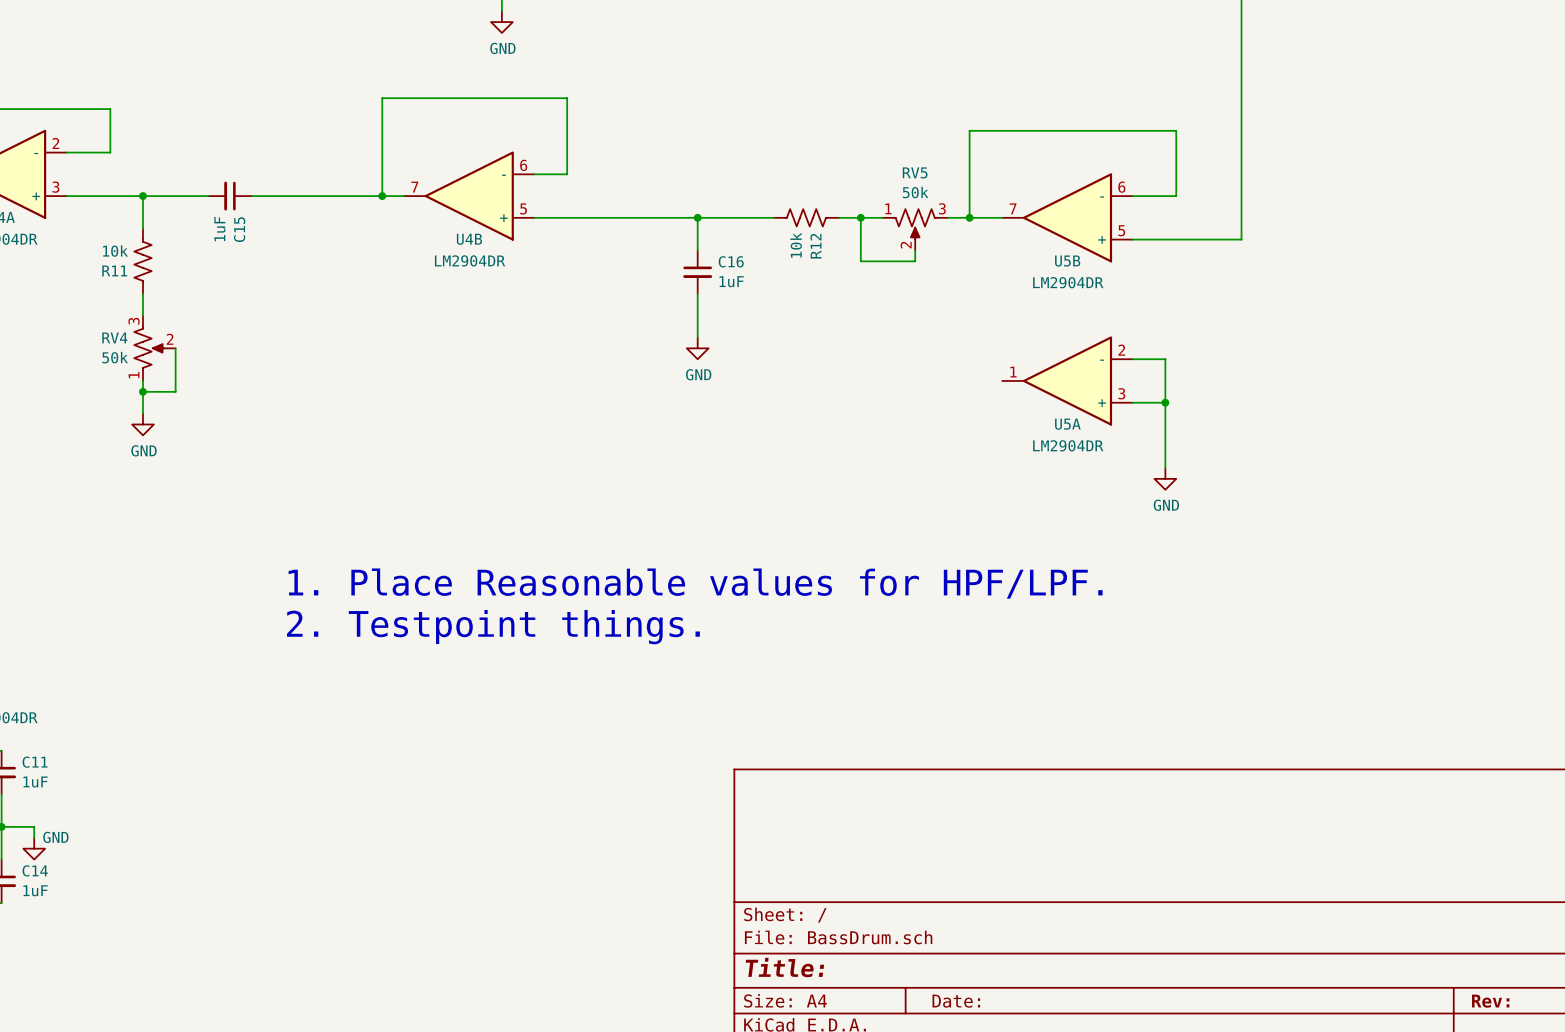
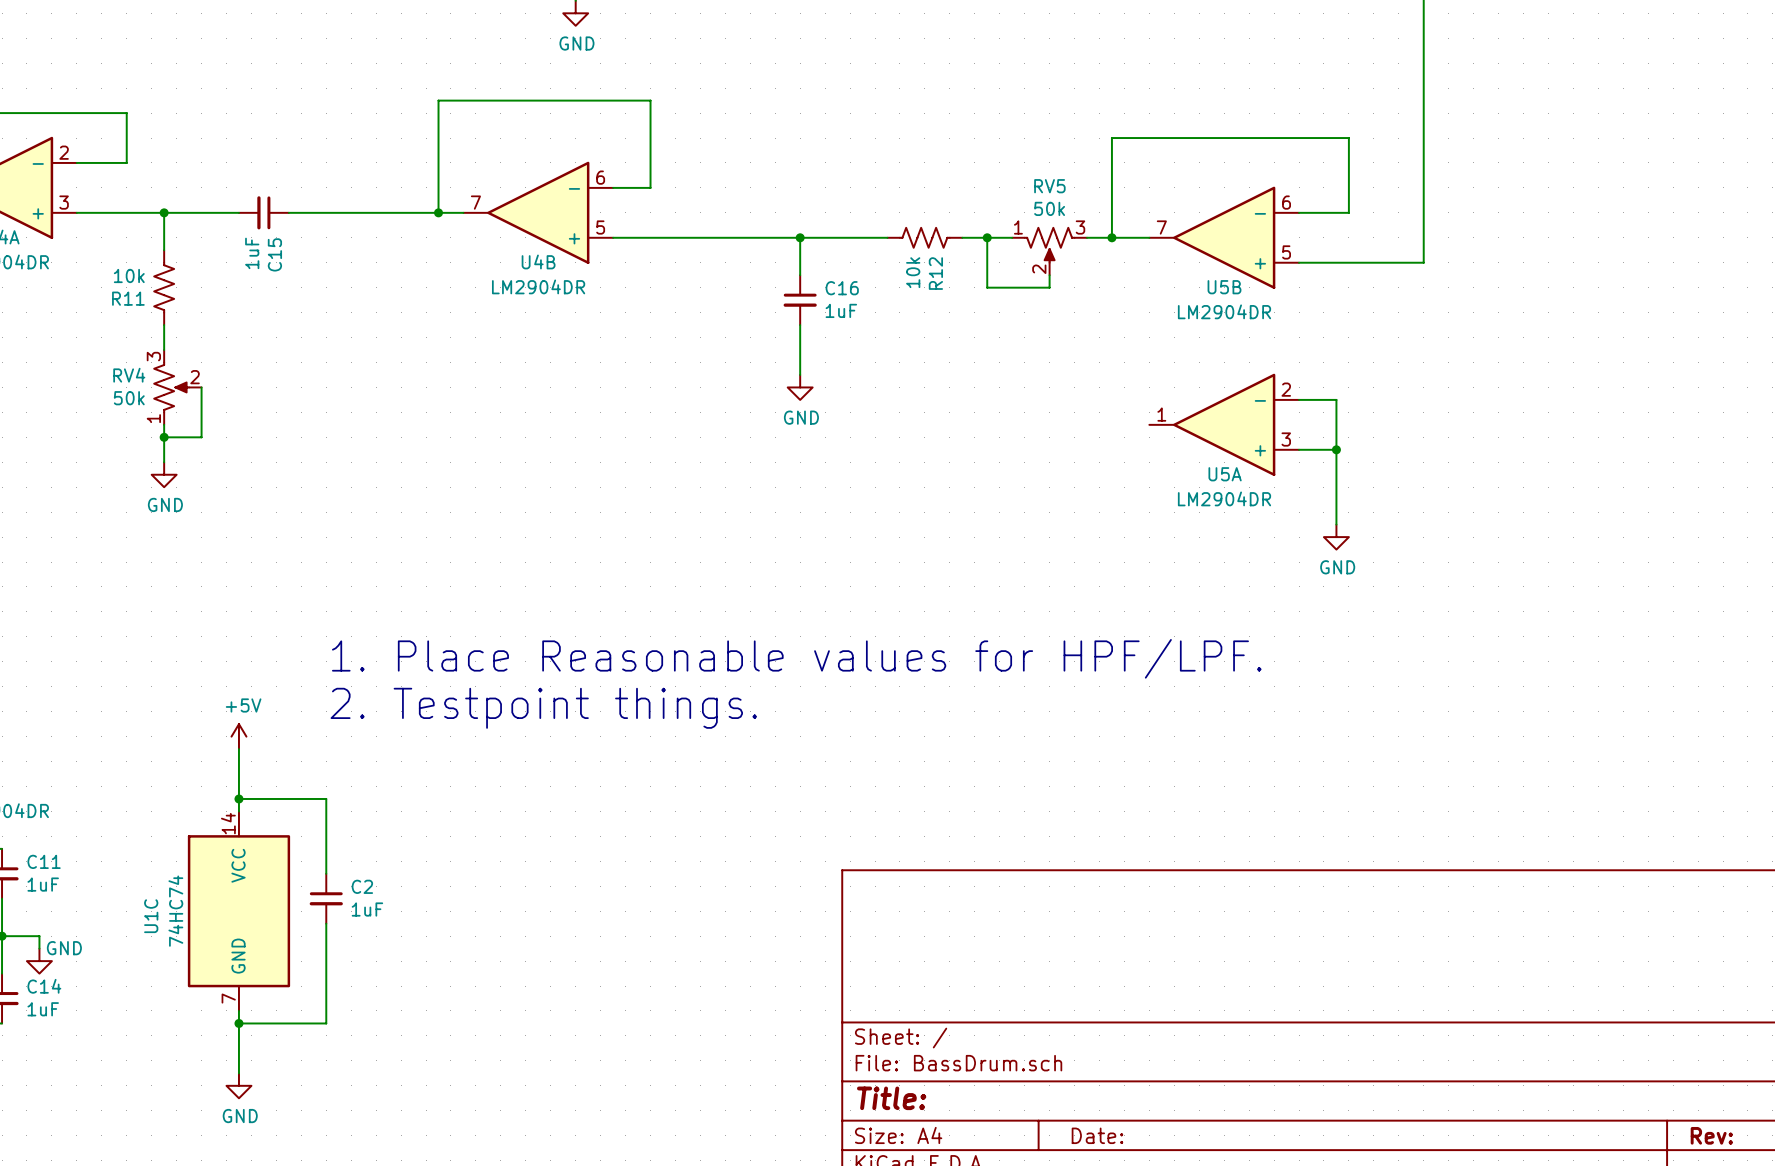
power symbol: none -> +5V (238, 736)
wire: none -> (238, 749) (238, 811)
wire: none -> (238, 798) (326, 798) (326, 873)
junction: none -> (238, 798)
C2: none -> 1uF (326, 898)
U1C: none -> 74HC74 (238, 911)
wire: none -> (326, 923) (326, 1023) (238, 1023)
wire: none -> (238, 1010) (238, 1073)
junction: none -> (238, 1023)
power symbol: none -> GND (238, 1085)

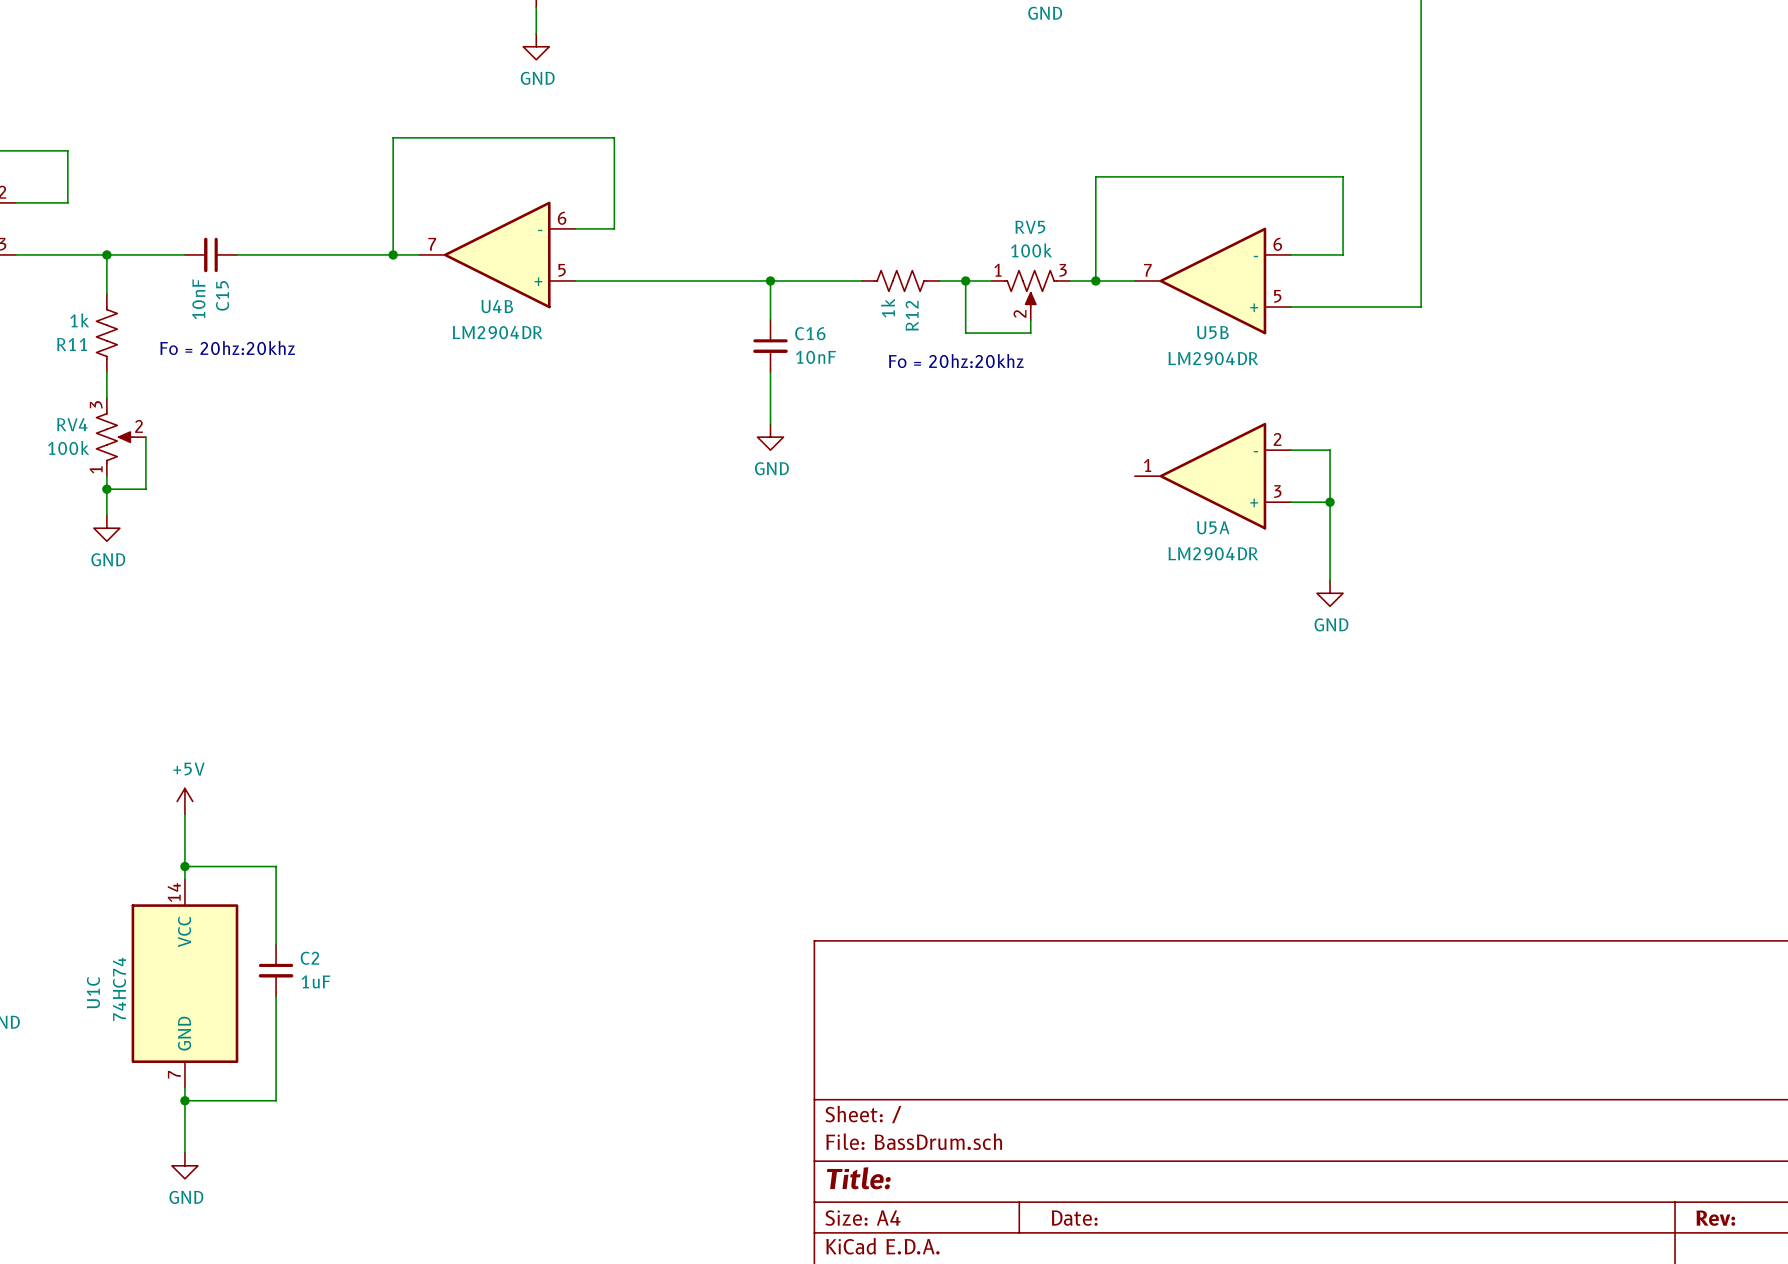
RV5 value: 50k (1049, 208) -> 100k (1031, 250)
C15 value: 1uF (252, 253) -> 10nF (198, 299)
R12 value: 10k (913, 272) -> 1k (888, 308)
R11 value: 10k (129, 275) -> 1k (79, 320)
text: none -> Fo = 20hz:20khz (227, 348)
C16 value: 1uF (841, 310) -> 10nF (816, 357)
text: none -> Fo = 20hz:20khz (956, 361)
RV4 value: 50k (129, 398) -> 100k (68, 448)
text: 1. Place Reasonable values for HPF/LPF. (796, 658) -> none
text: 2. Testpoint things. (543, 708) -> none

